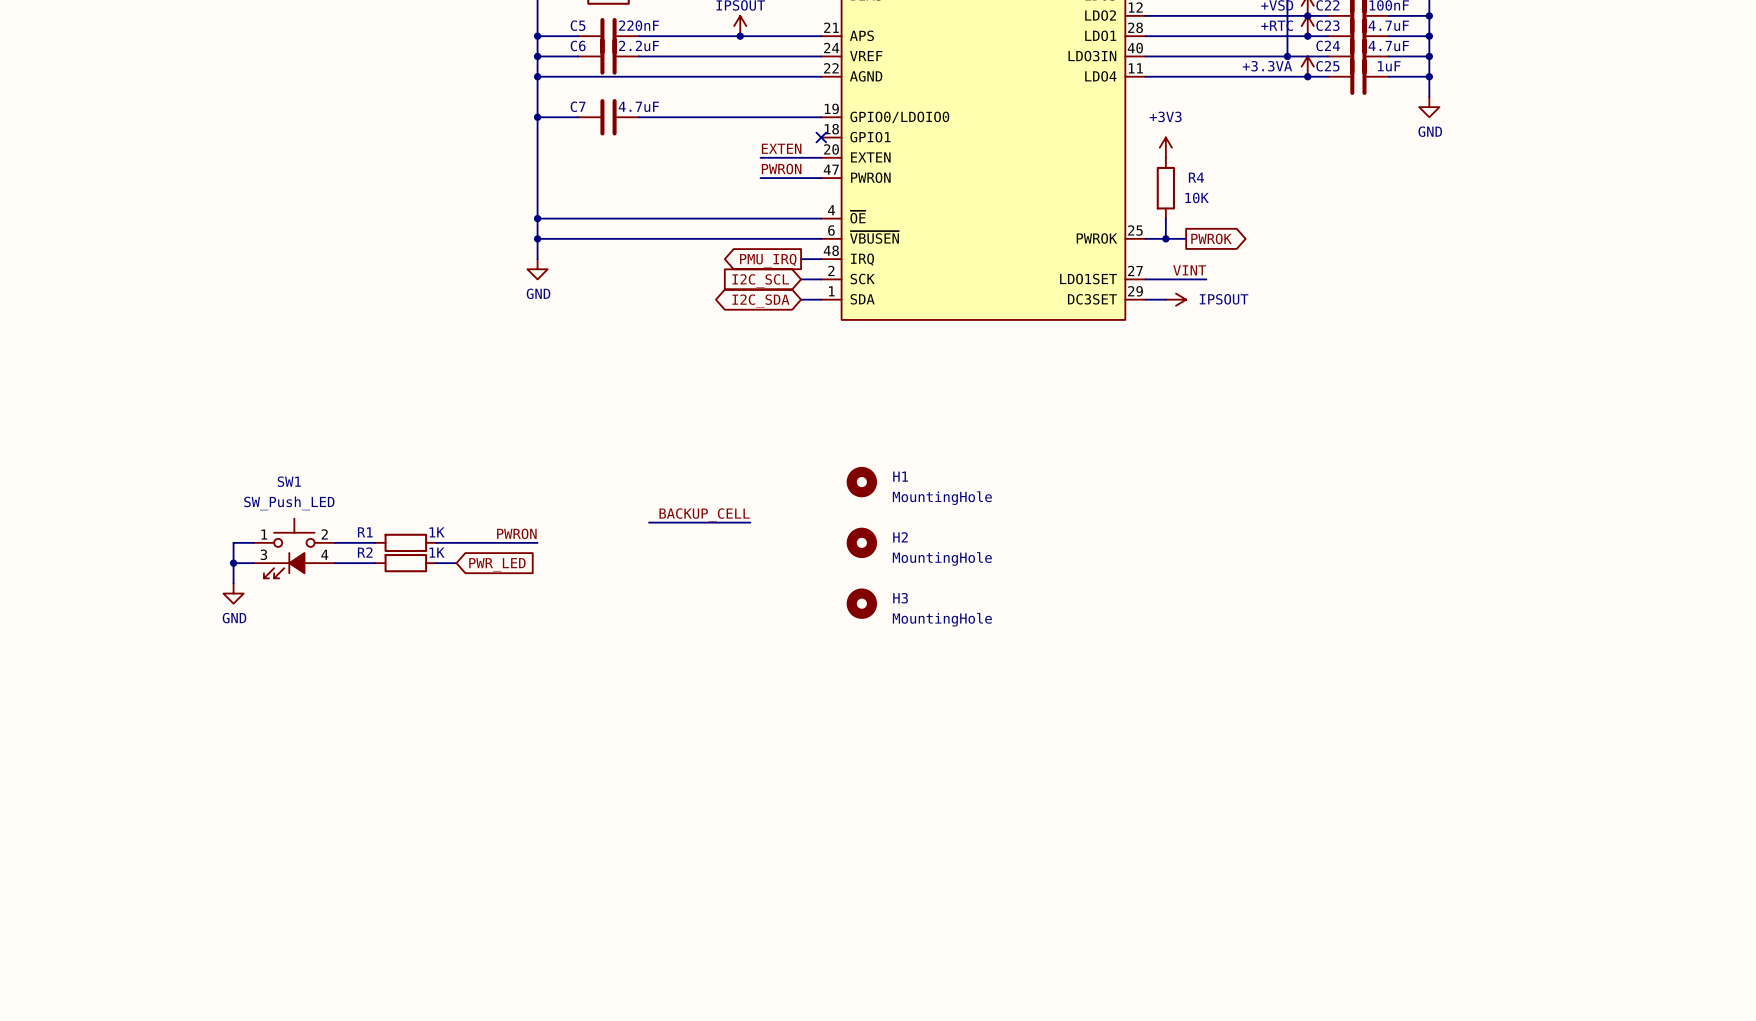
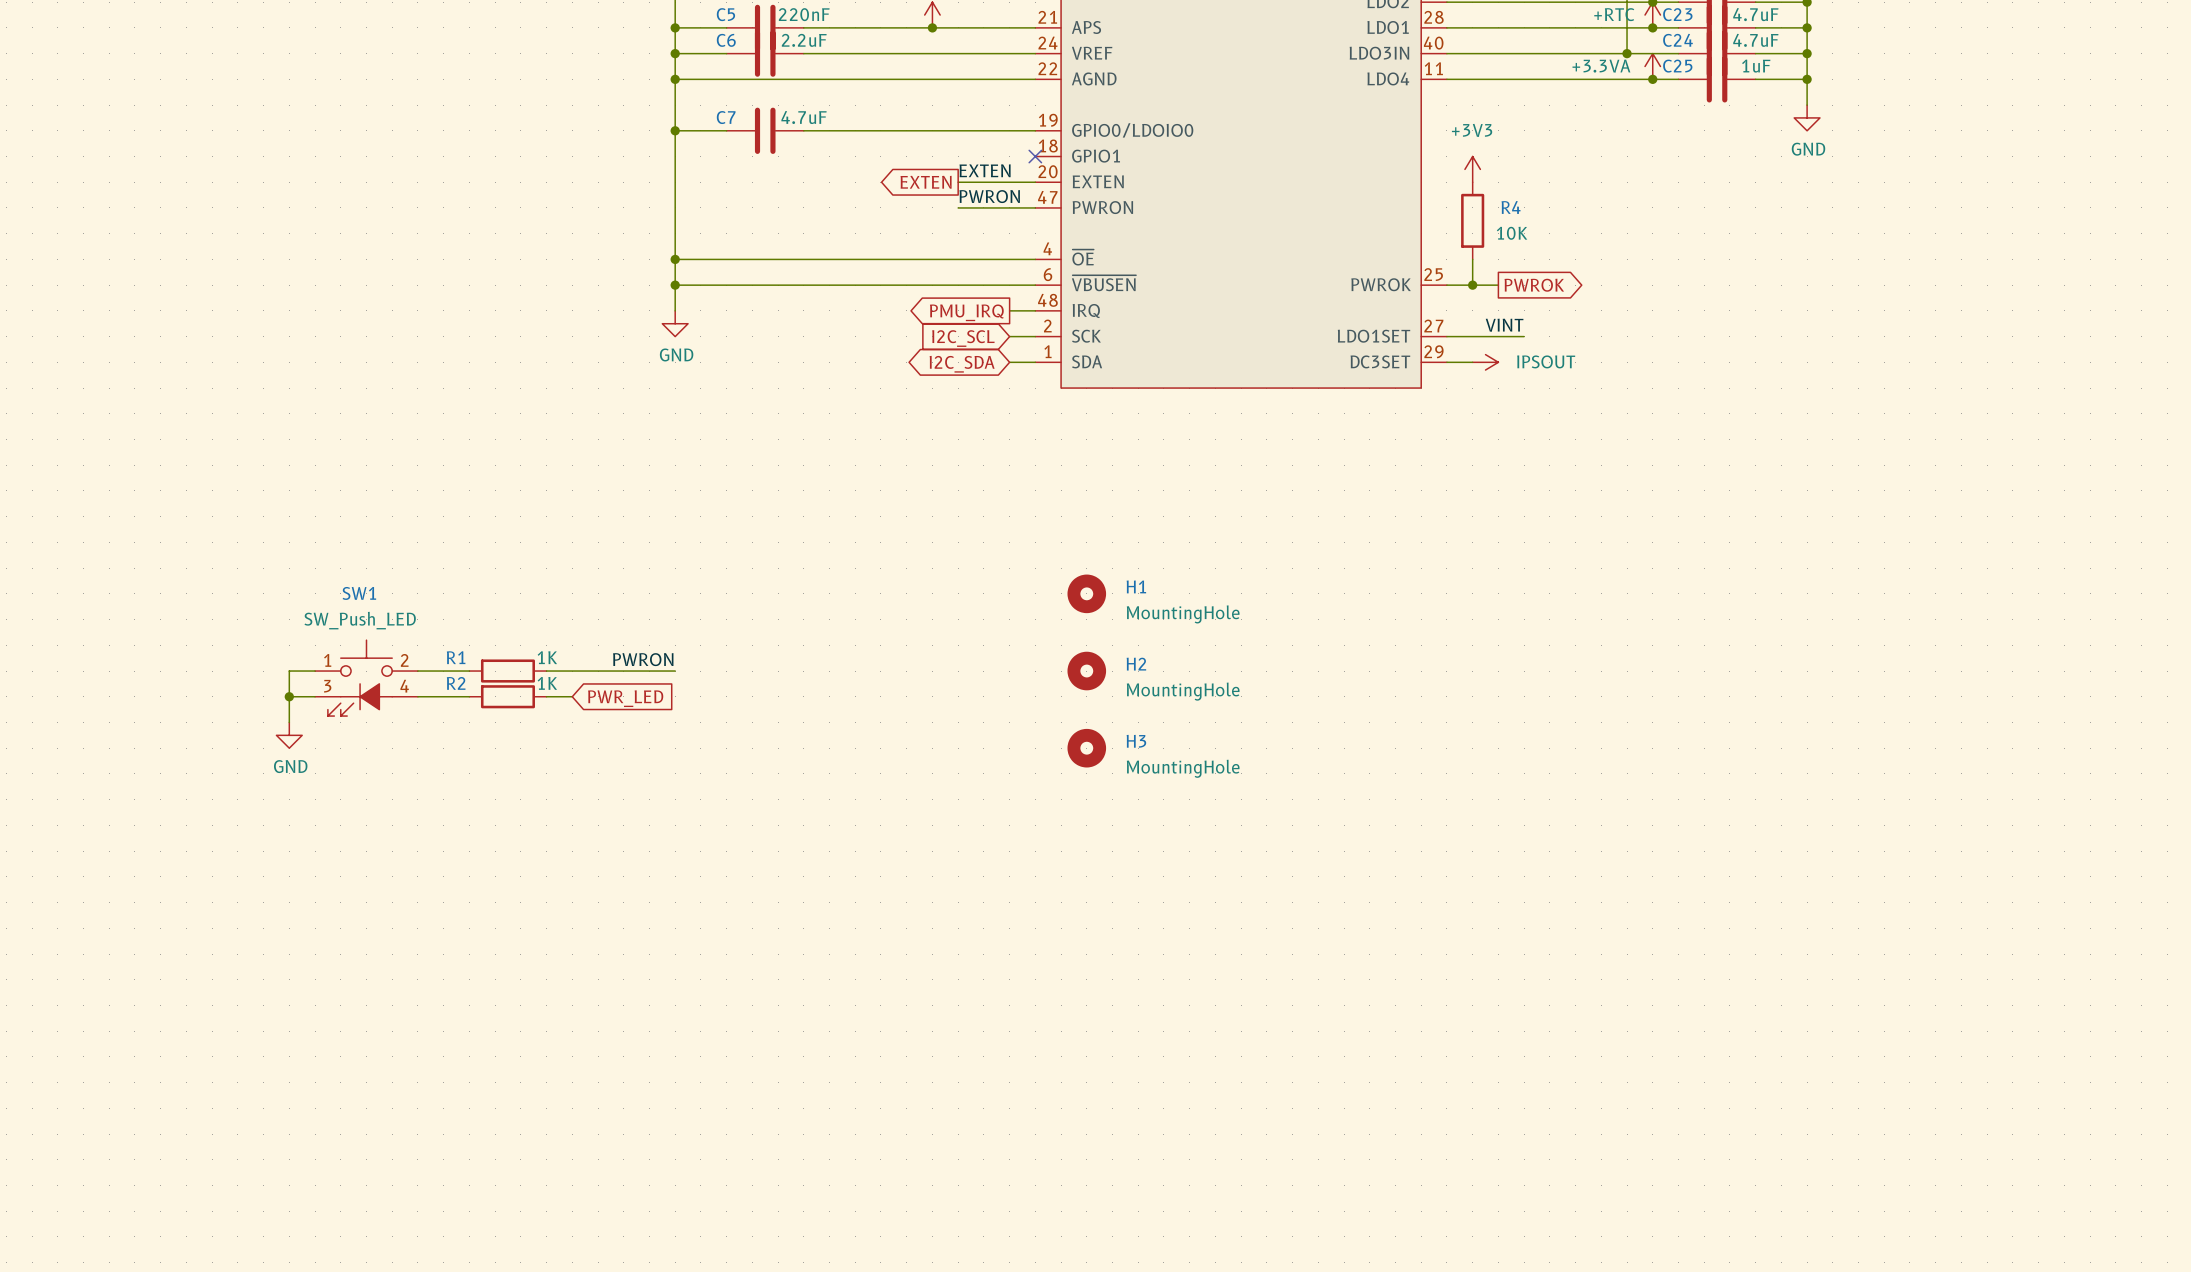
global label: none -> EXTEN (926, 182)
label: BACKUP_CELL (704, 515) -> none
wire: (649, 522) (750, 522) -> none

